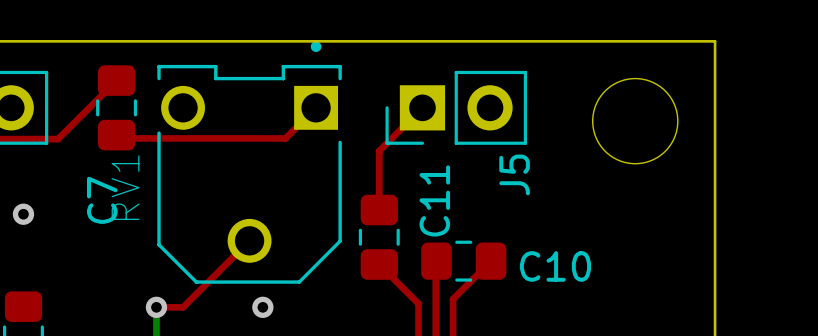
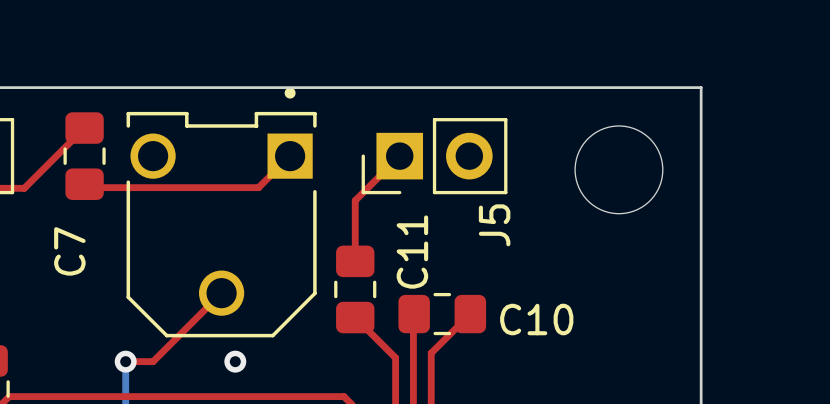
RV1 name: RV1 (125, 187) -> none

